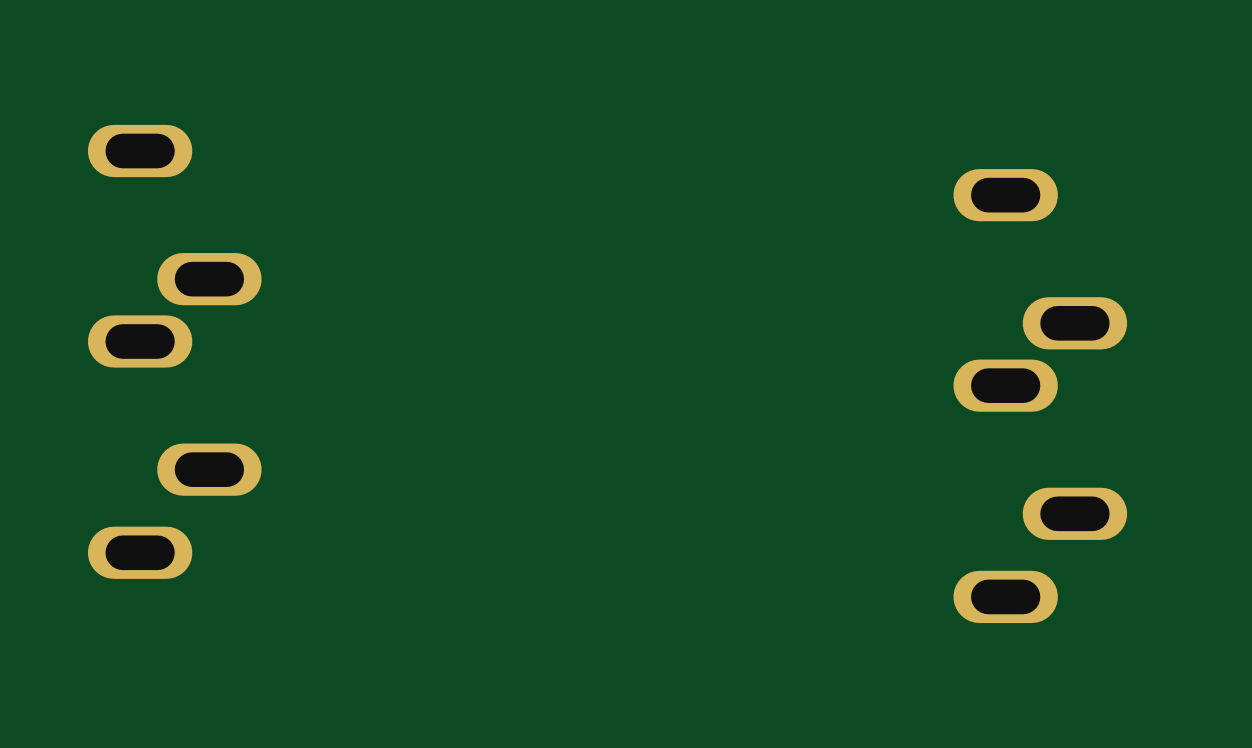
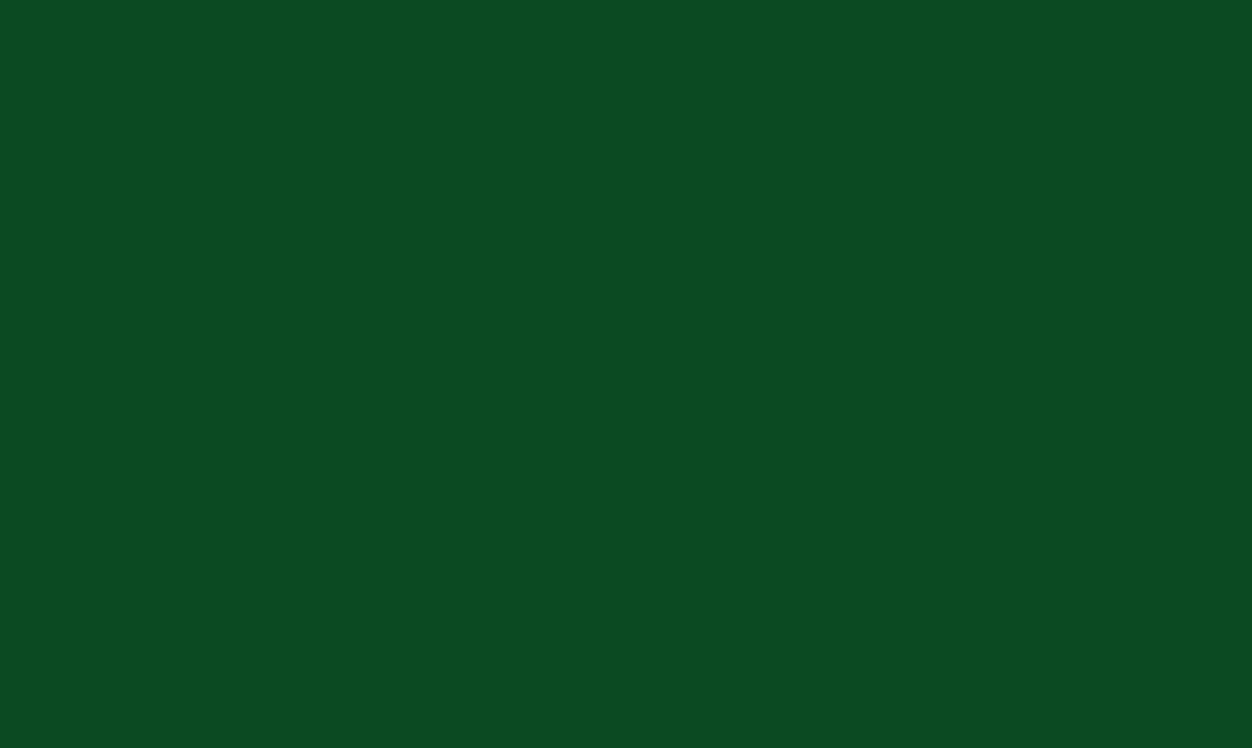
part: (174, 351) -> none
part: (1040, 396) -> none

